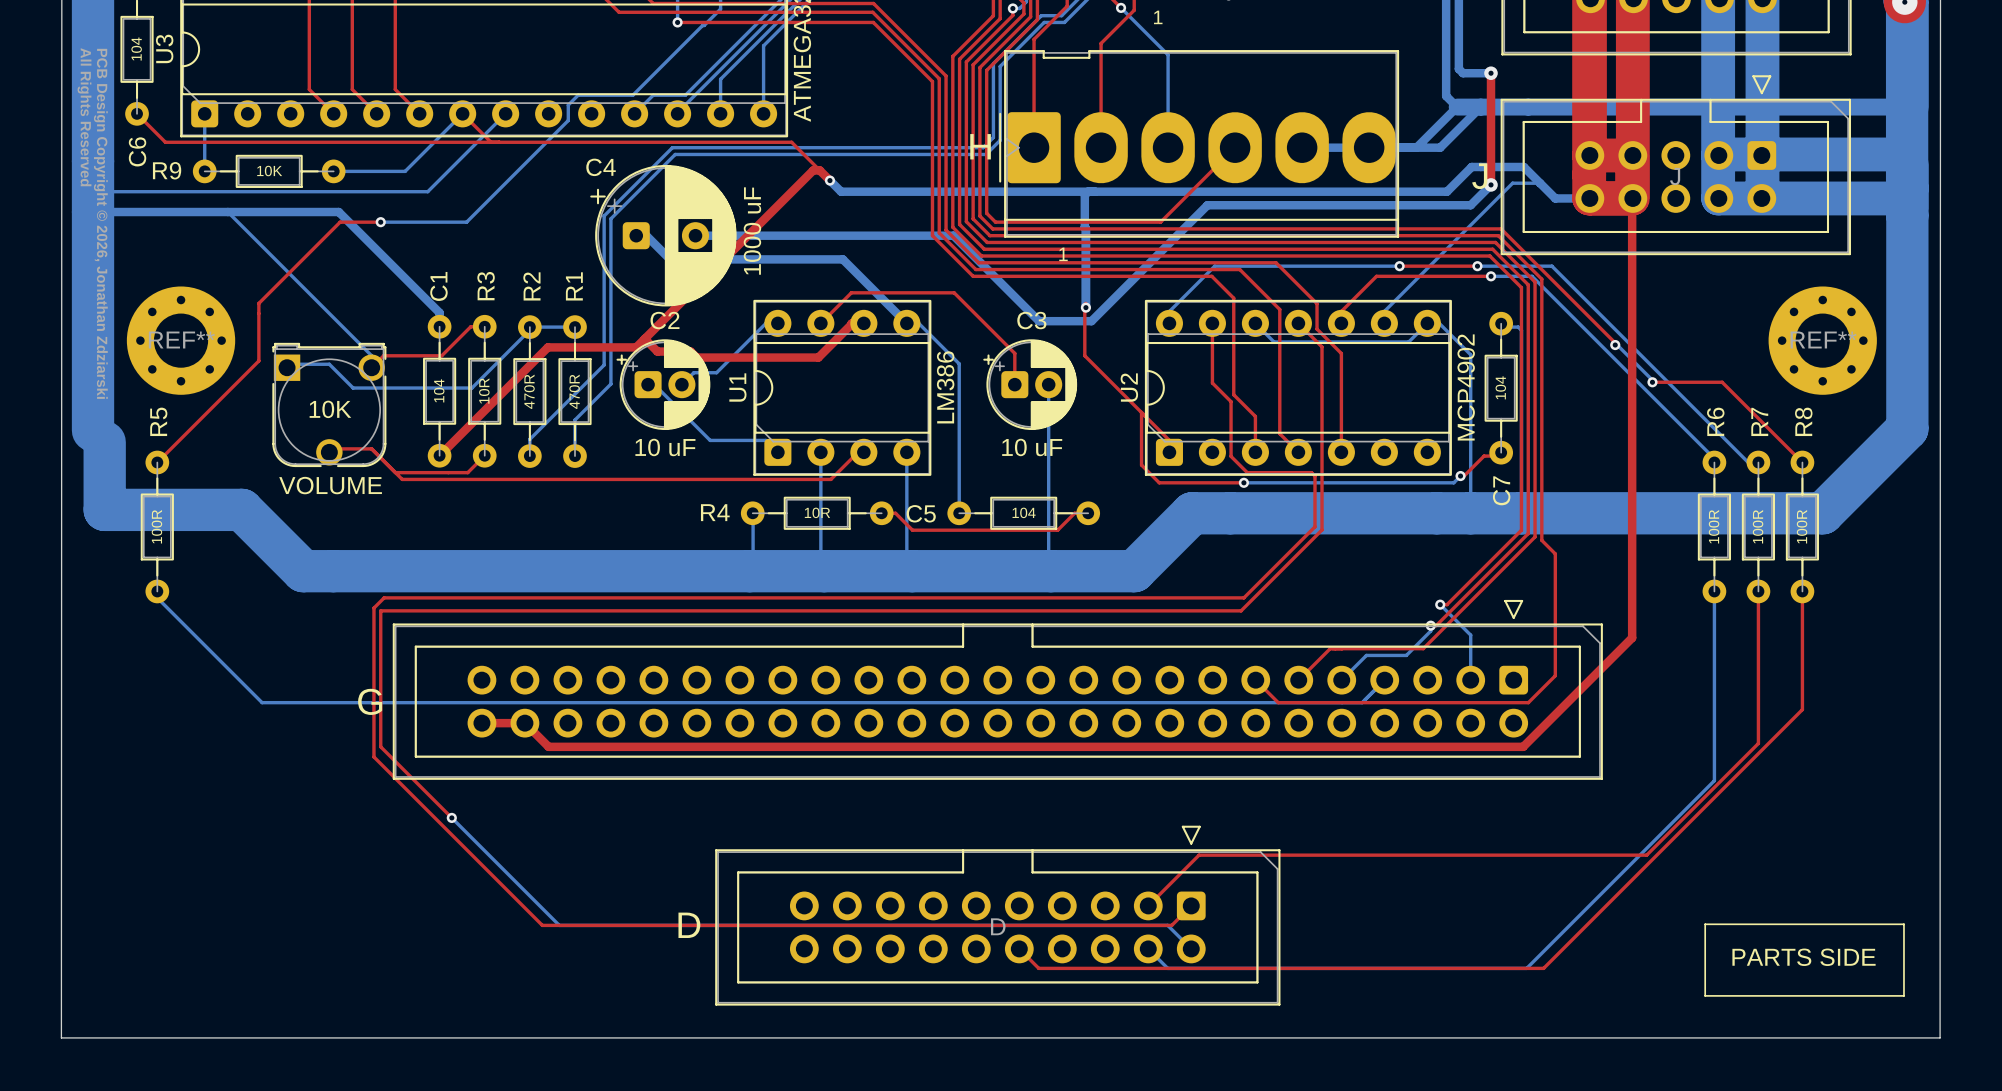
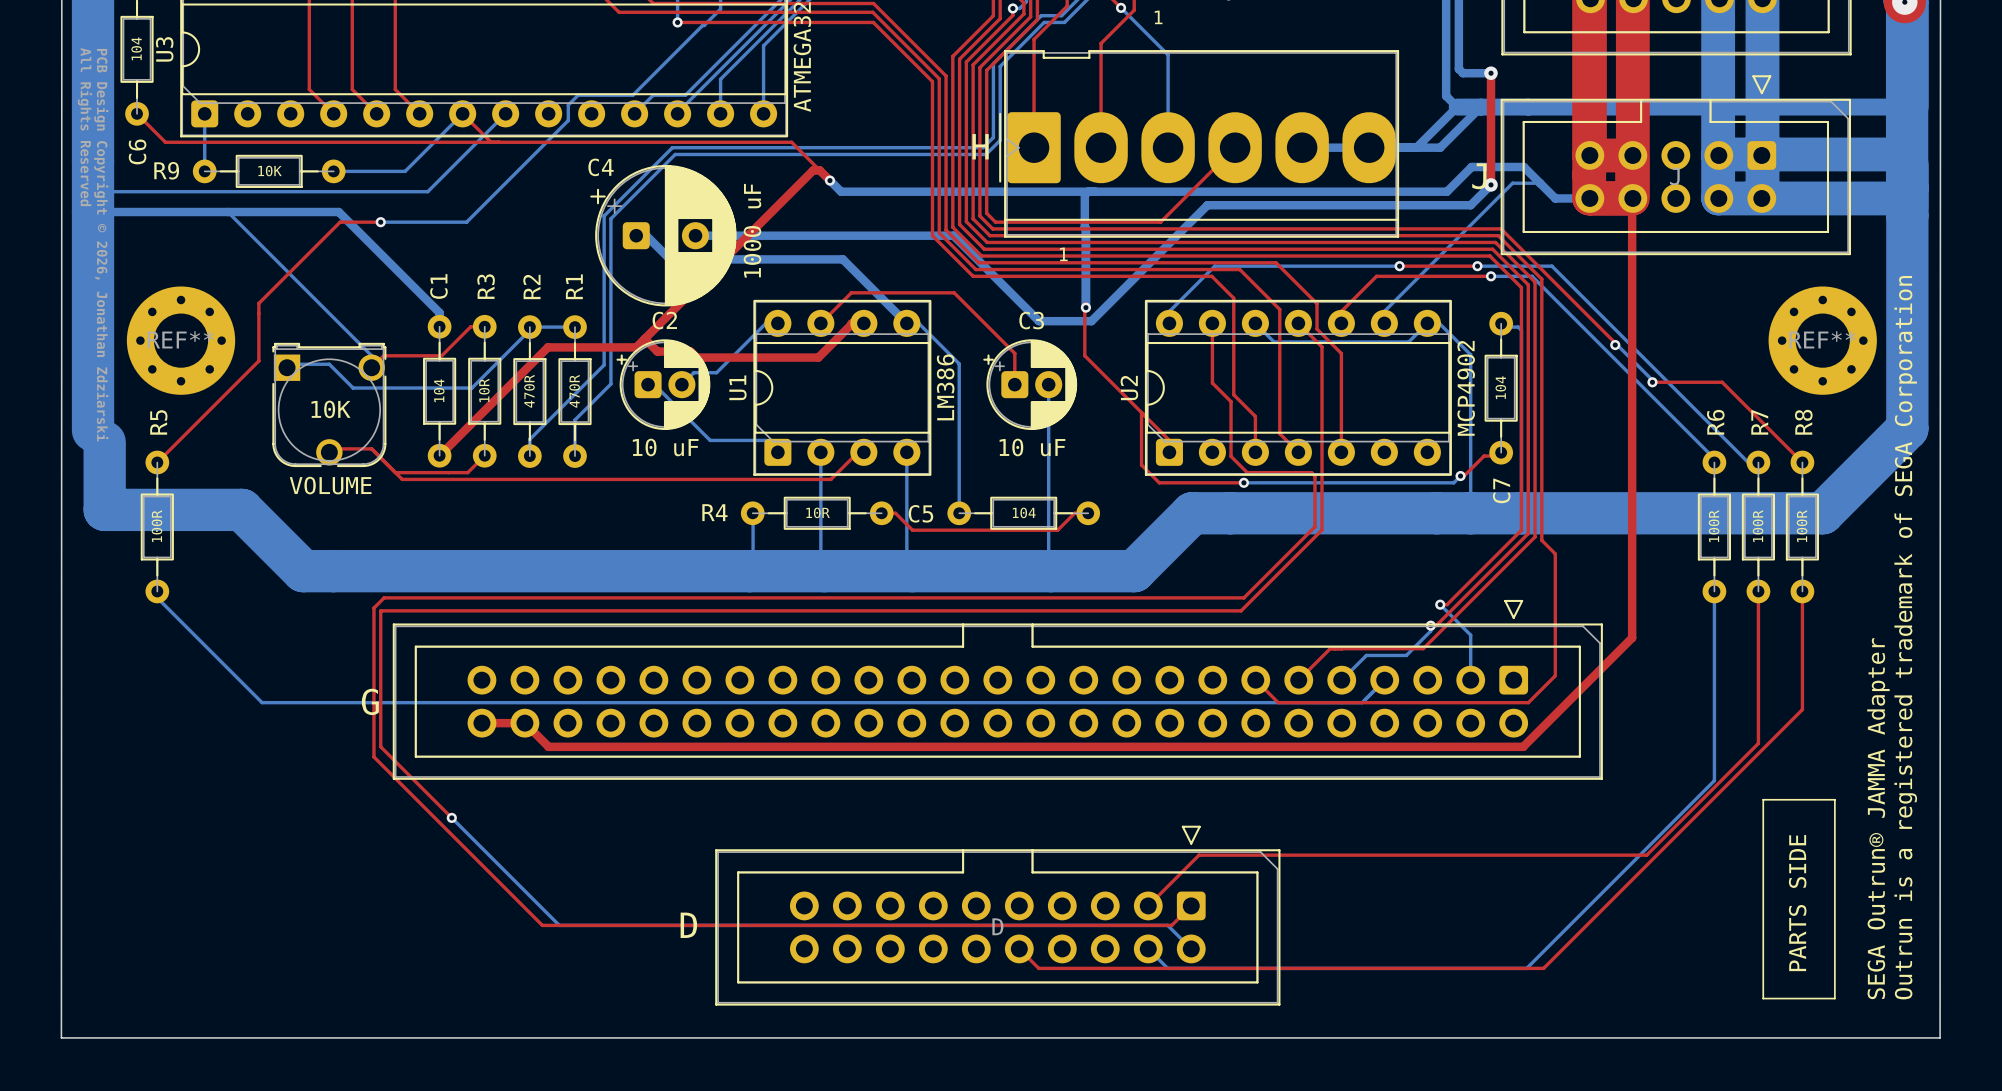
text: none -> Outrun is a registered trademark of SEGA Corporation (1905, 637)
line: none -> (1763, 799) (1834, 799) (1834, 998) (1763, 998) (1763, 799)
text: none -> SEGA Outrun® JAMMA Adapter (1878, 818)
line: (1705, 924) (1903, 924) (1903, 995) (1705, 995) (1705, 924) -> none
text rotation: 0° (1804, 957) -> 90° counterclockwise (1797, 903)

